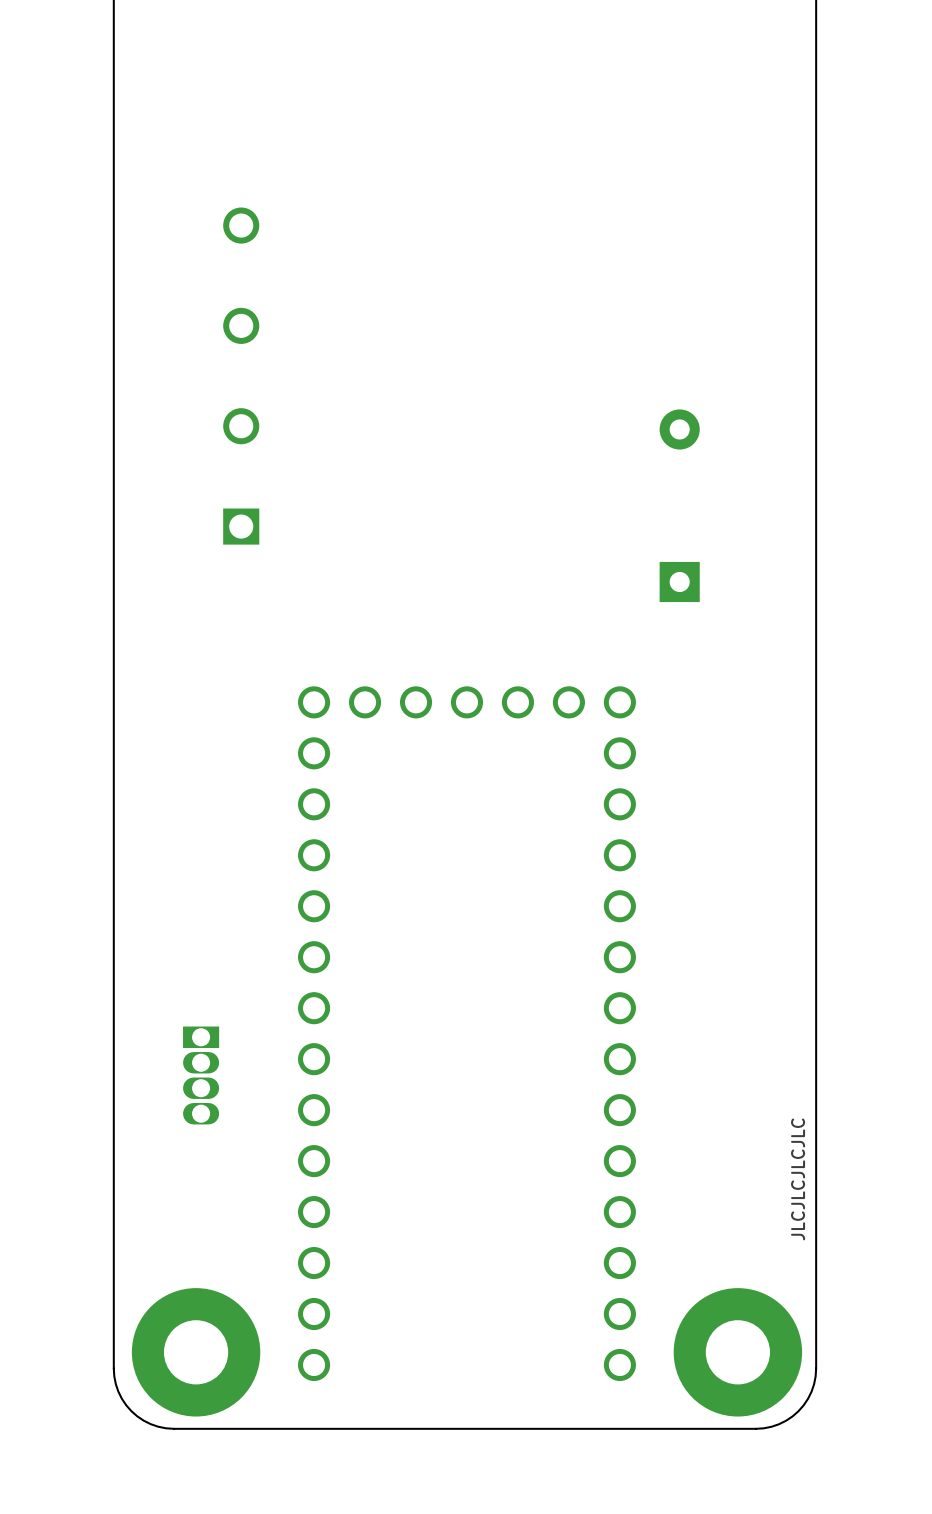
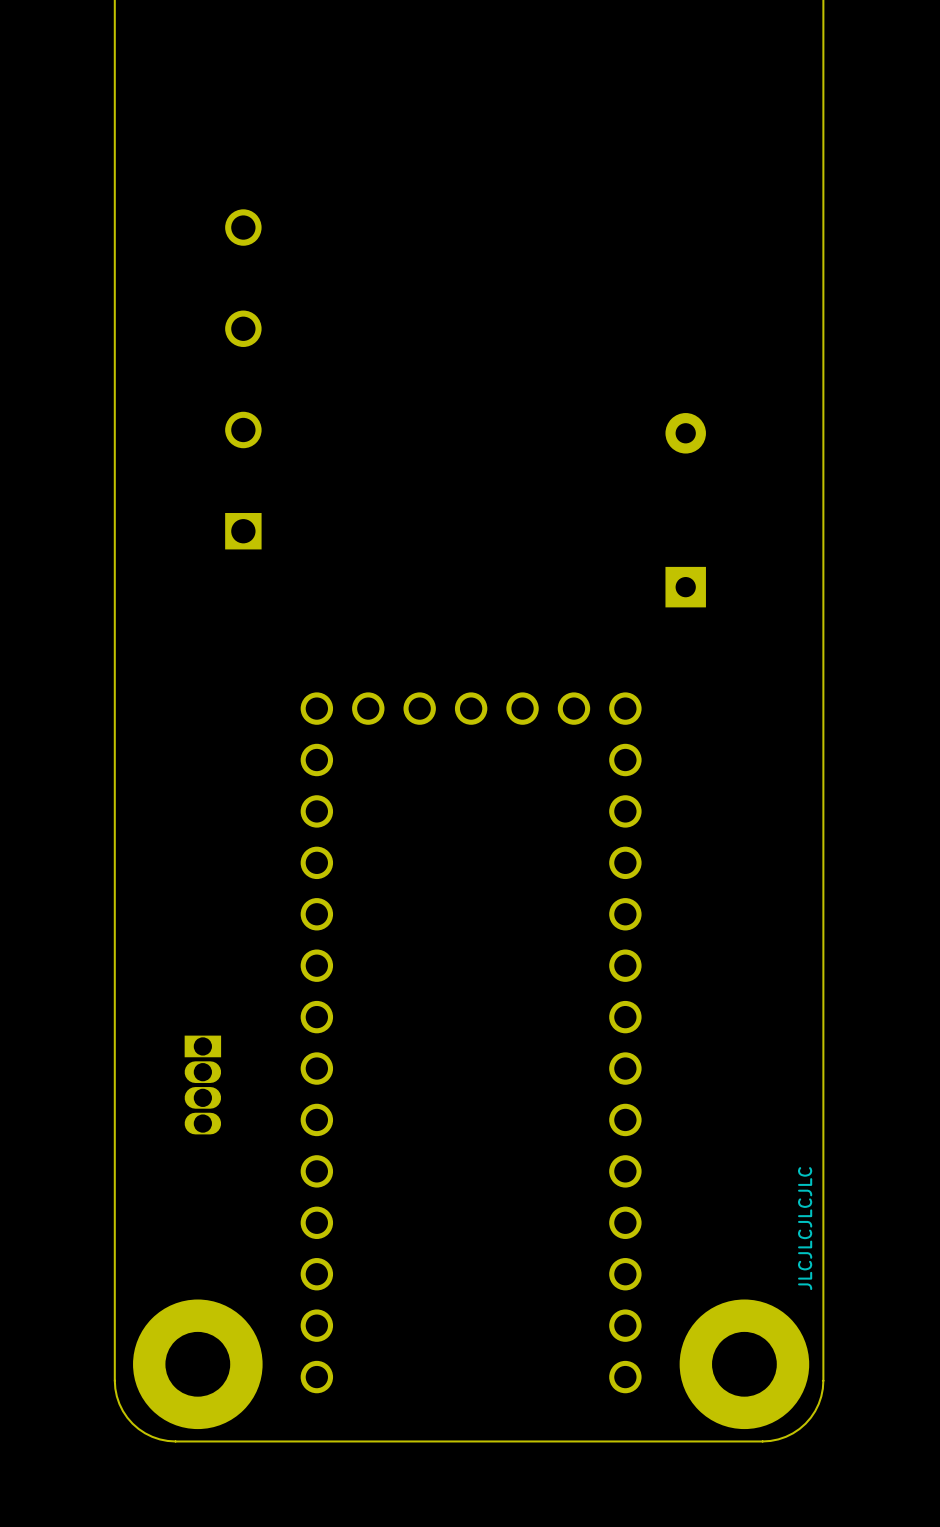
text position: JLCJLCJLCJLC (798, 1179) -> JLCJLCJLCJLC (805, 1228)

